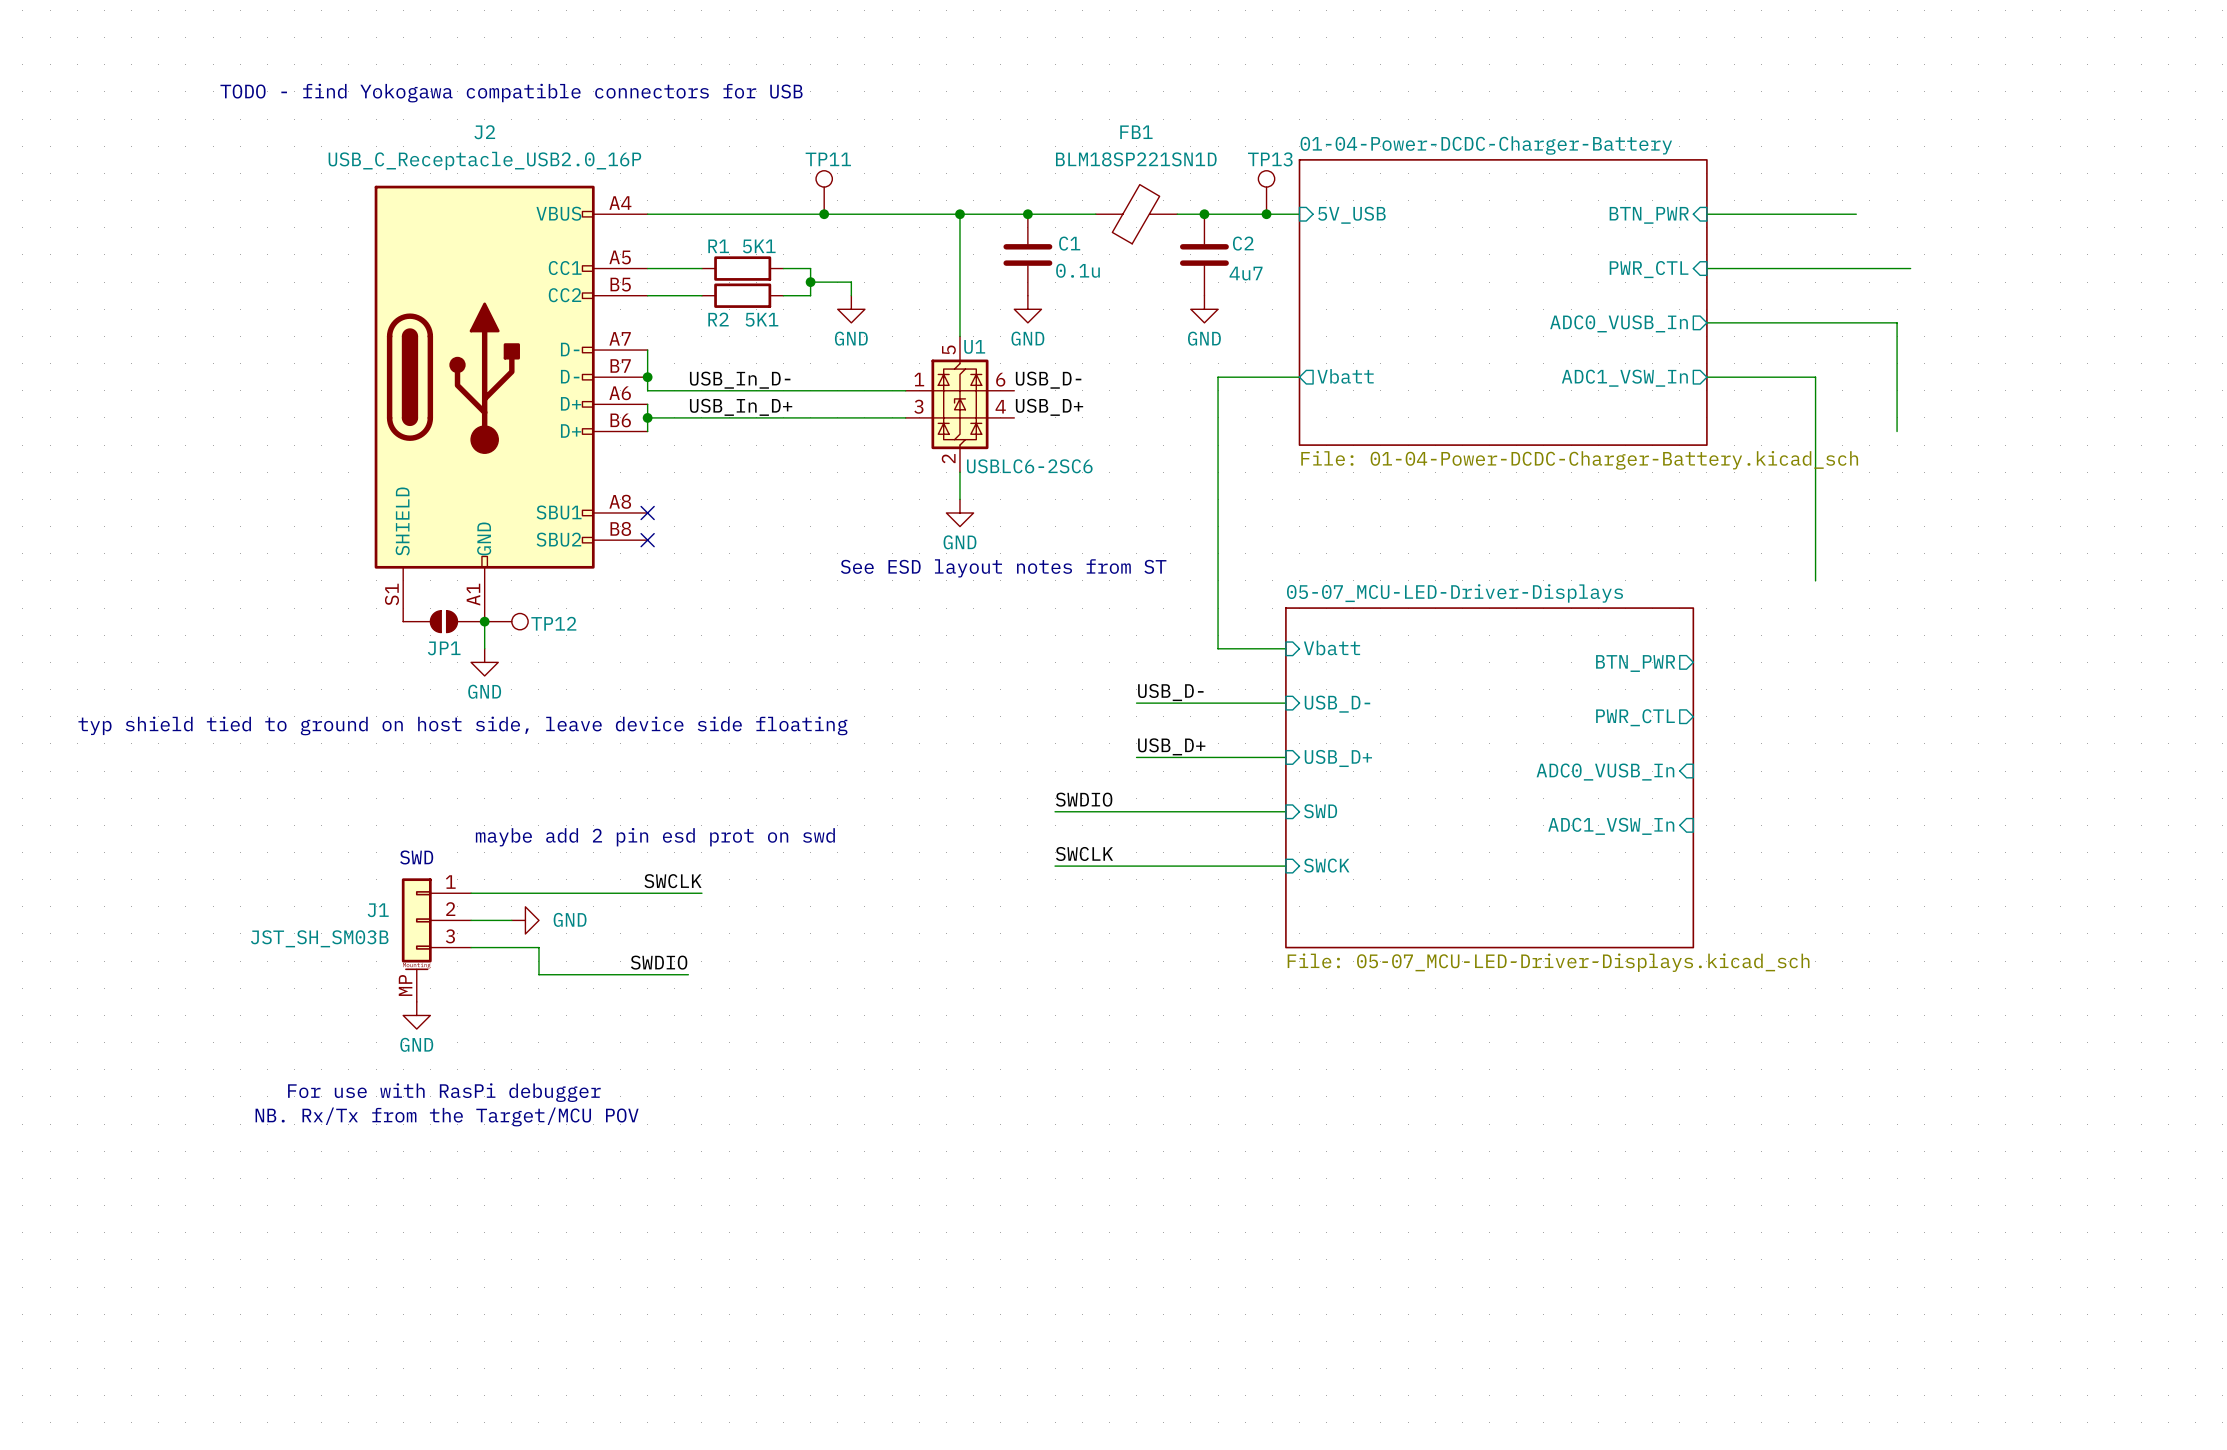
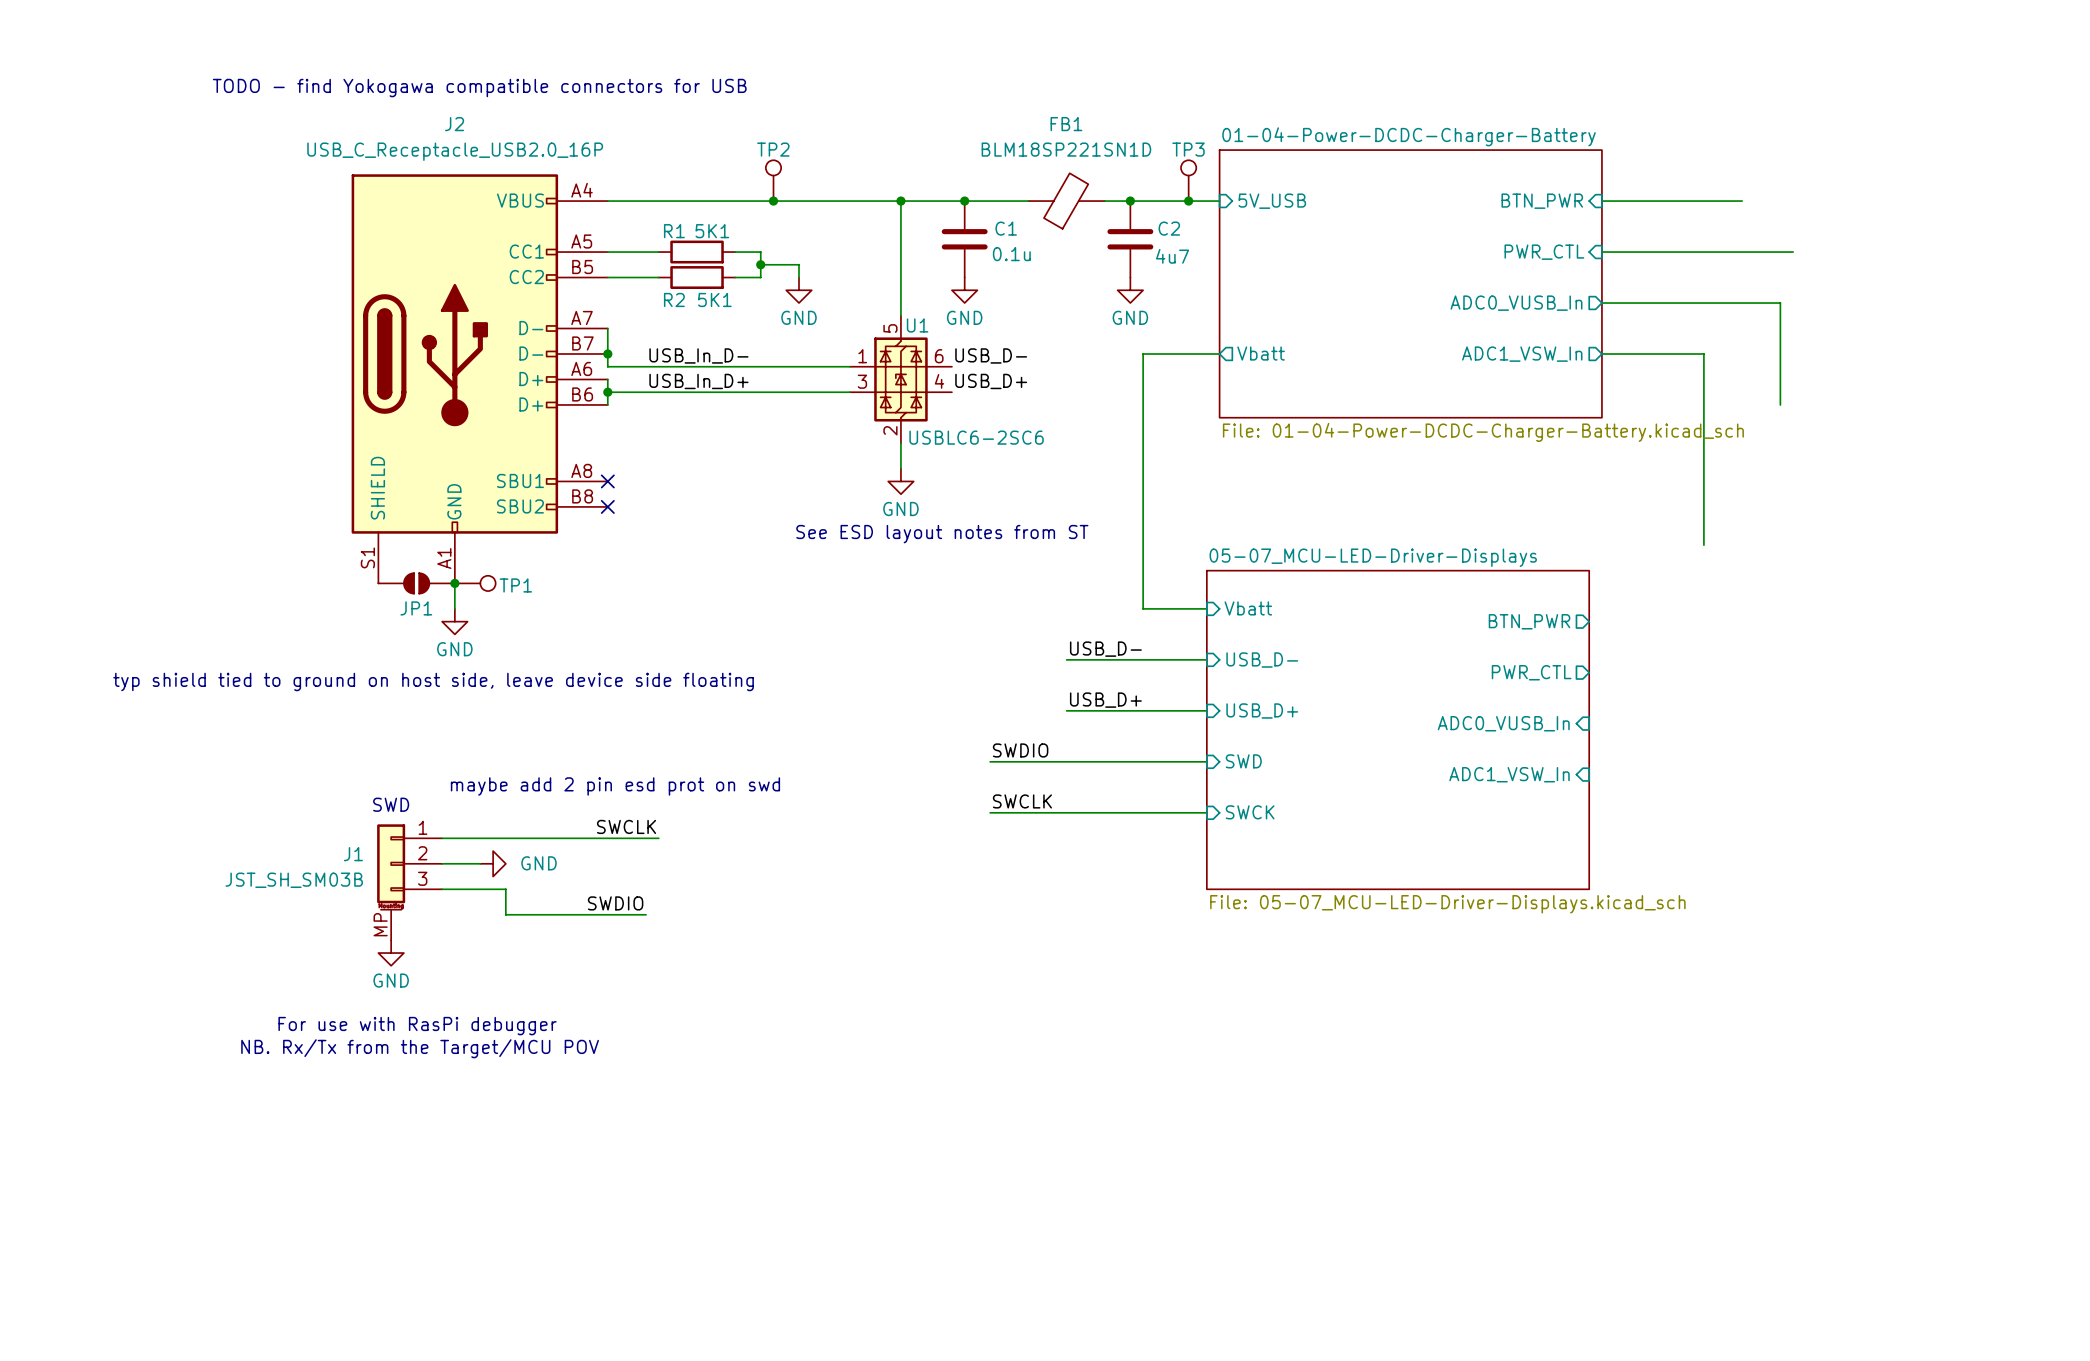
TP11 name: TP11 (828, 159) -> TP2 (773, 149)
TP13 name: TP13 (1270, 159) -> TP3 (1188, 149)
TP12 name: TP12 (553, 623) -> TP1 (515, 585)

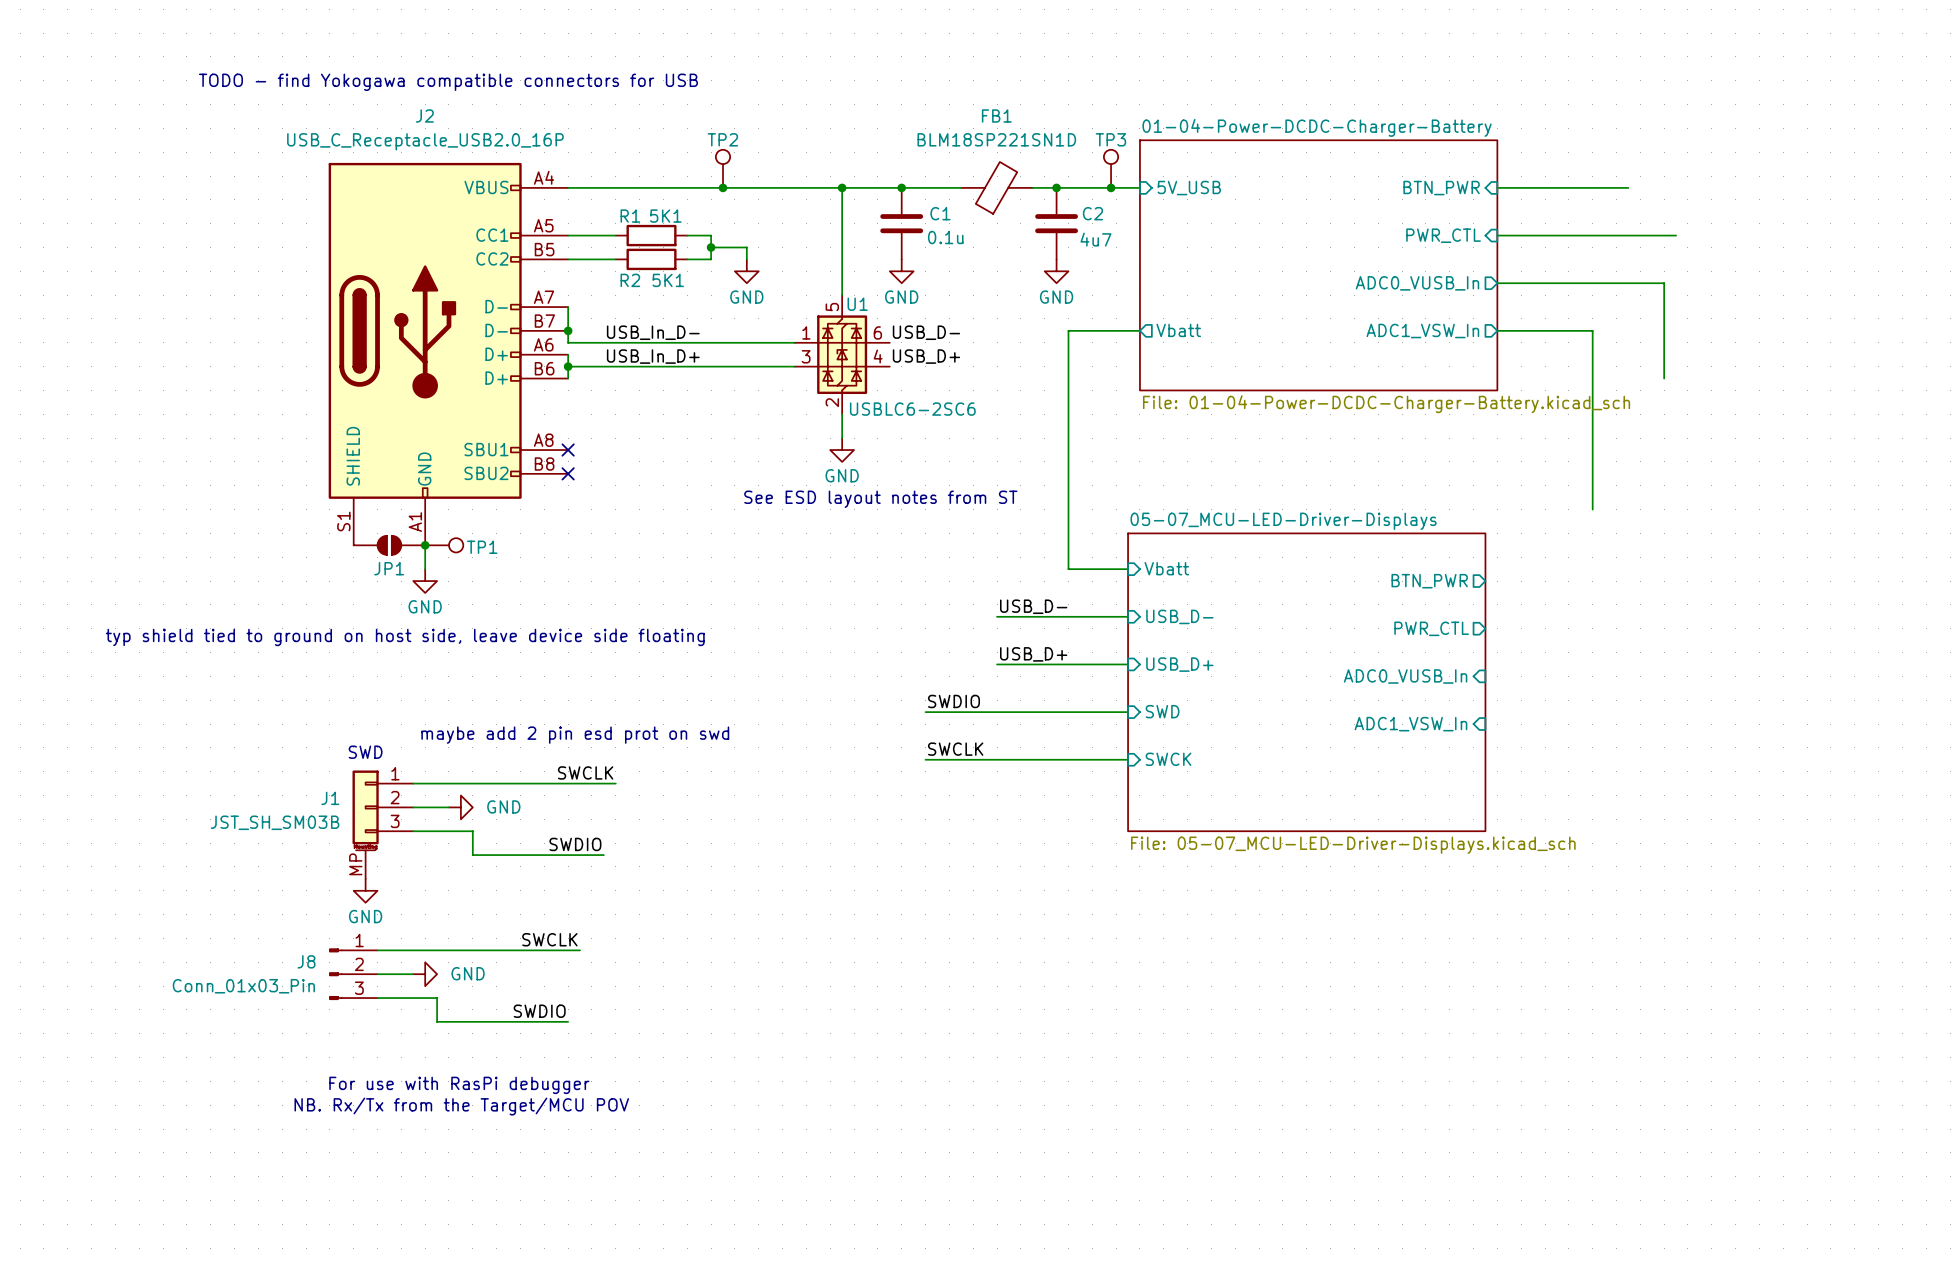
label: none -> SWCLK (549, 939)
wire: none -> (377, 950) (580, 950)
text position: For use with RasPi debugger (417, 1026) -> For use with RasPi debugger (459, 1085)
J8: none -> Conn_01x03_Pin (353, 974)
wire: none -> (377, 974) (413, 974)
power symbol: none -> GND (425, 974)
text position: NB. Rx/Tx from the Target/MCU POV (420, 1048) -> NB. Rx/Tx from the Target/MCU POV (461, 1106)
wire: none -> (377, 998) (437, 998) (437, 1021) (568, 1021)
label: none -> SWDIO (539, 1011)

